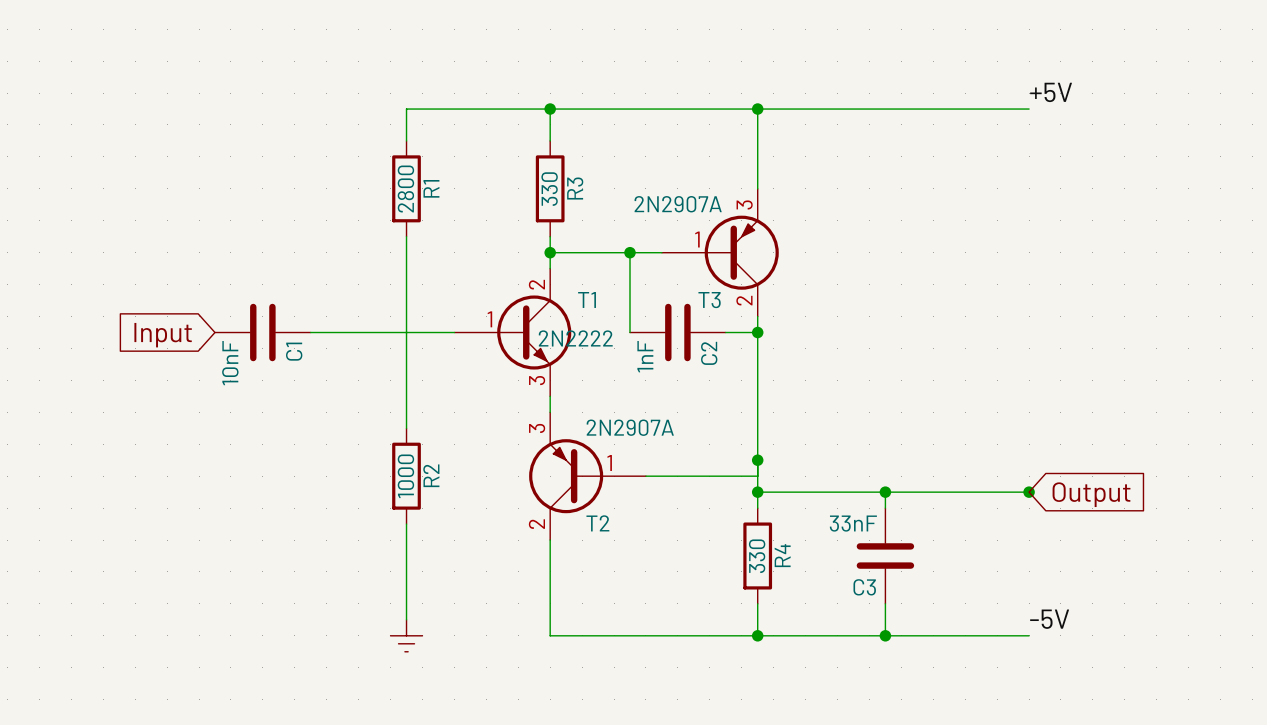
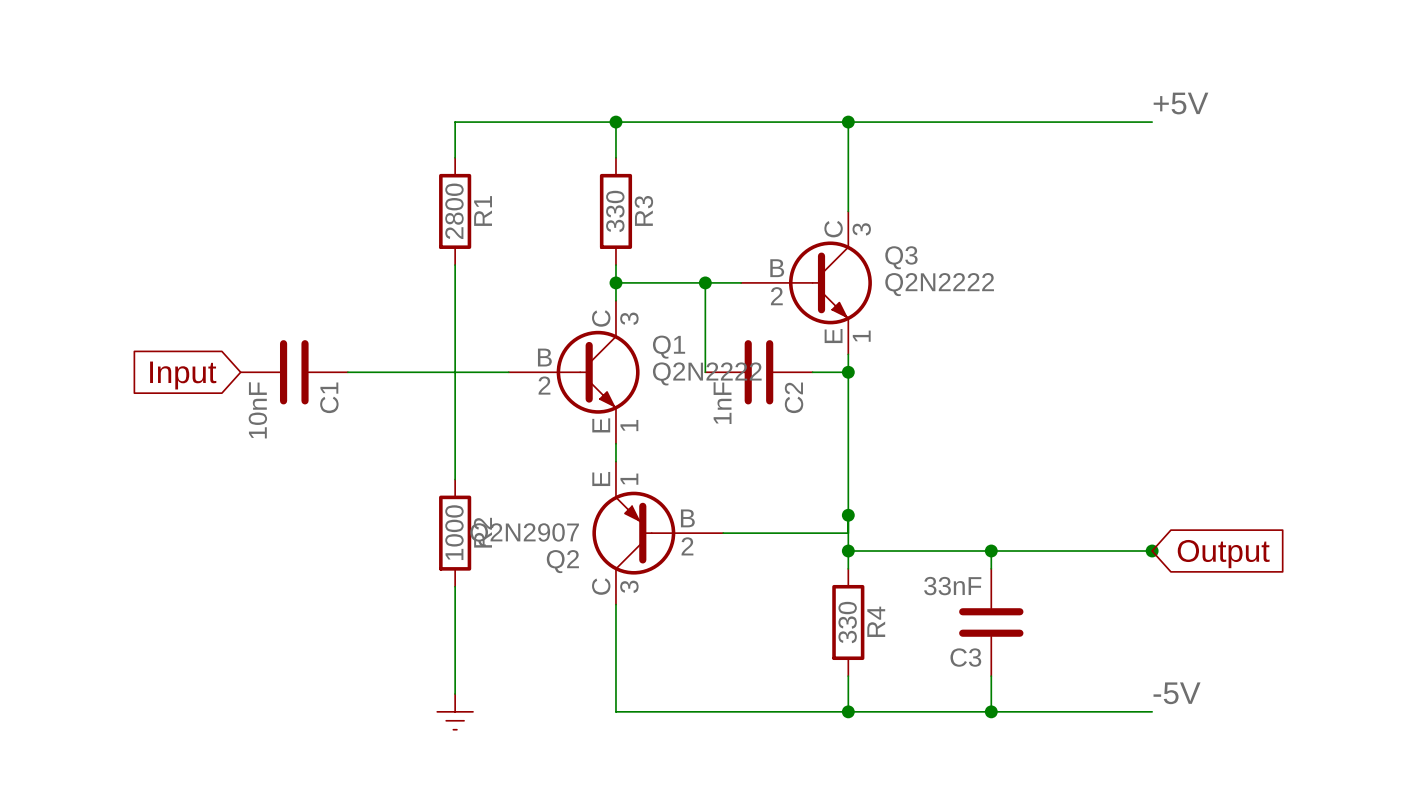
T3: 2N2907A (720, 252) -> none
Q3: none -> Q2N2222 (806, 282)
T1: 2N2222 (512, 332) -> none
Q1: none -> Q2N2222 (574, 372)
T2: 2N2907A (587, 476) -> none
Q2: none -> Q2N2907 (657, 533)

